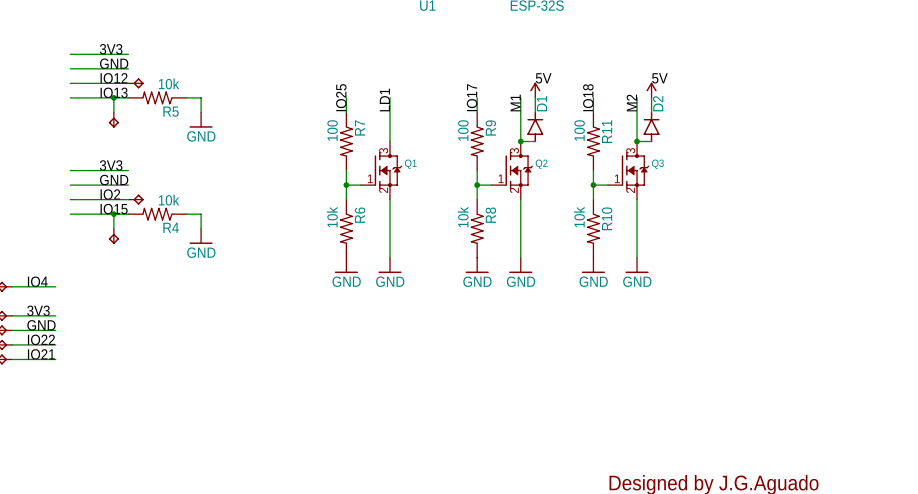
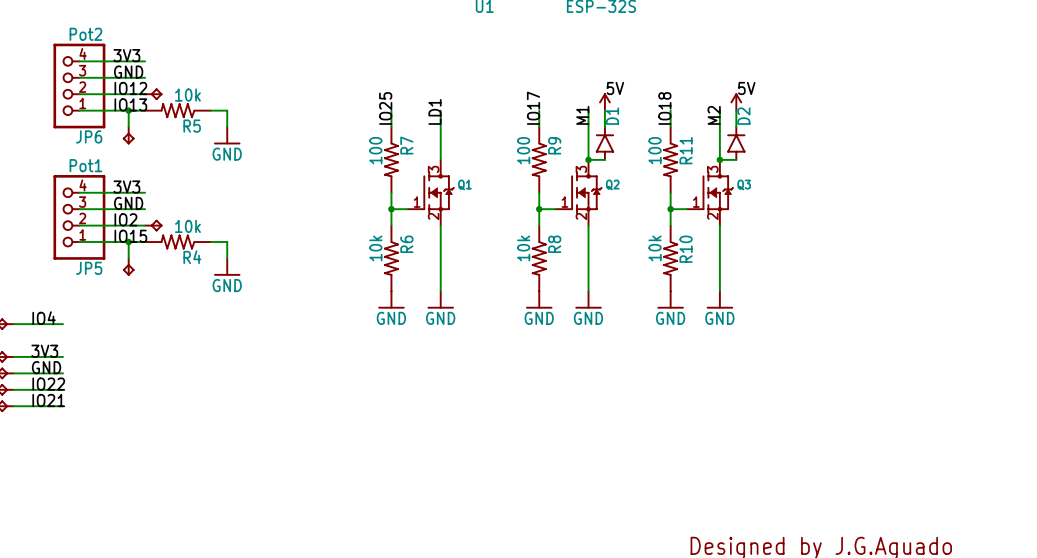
JP6: none -> Pot2 (79, 86)
JP5: none -> Pot1 (79, 217)

